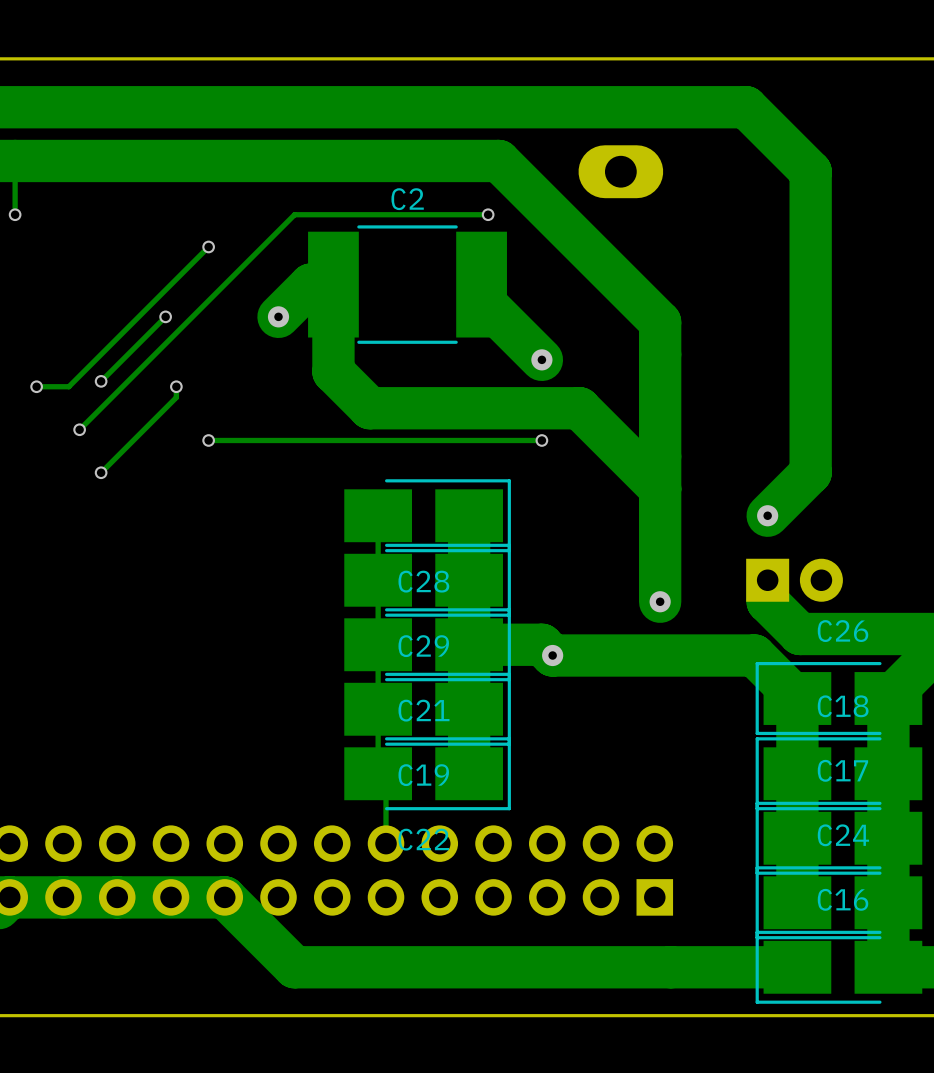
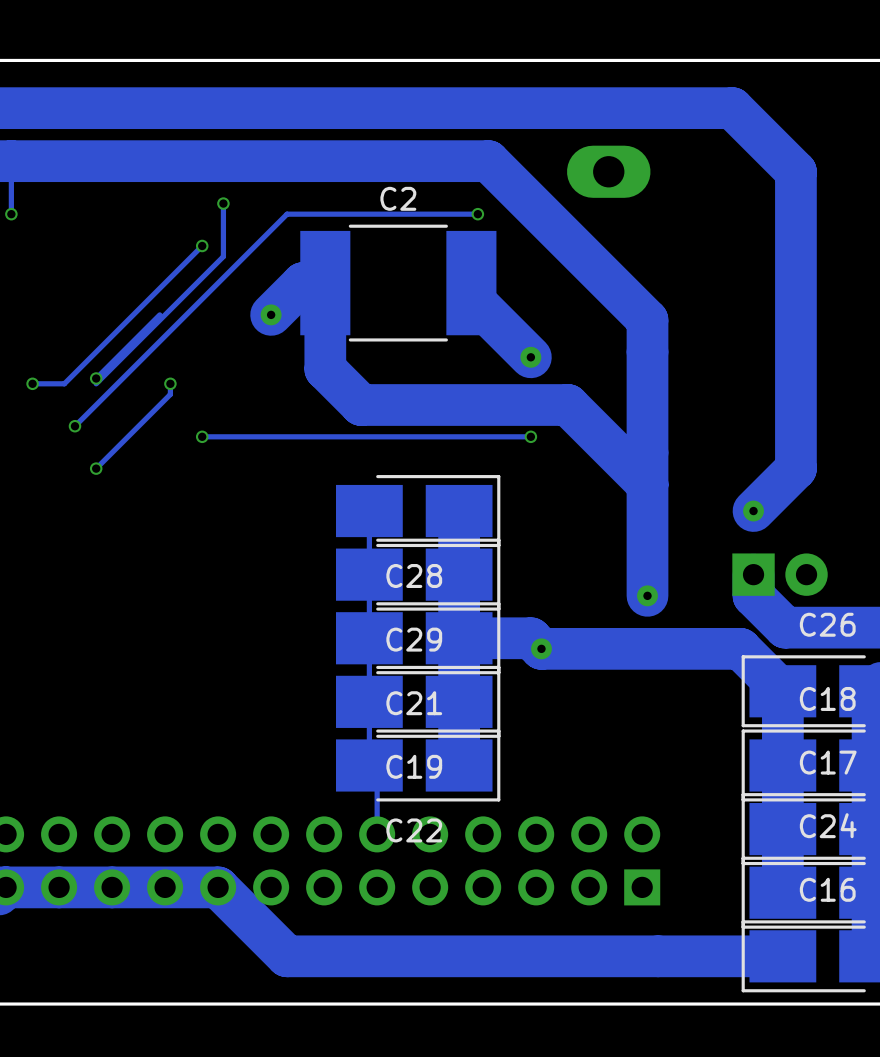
track: none -> (223, 203) (223, 256) (96, 383)
via: none -> (223, 203)
via: (165, 316) -> none

